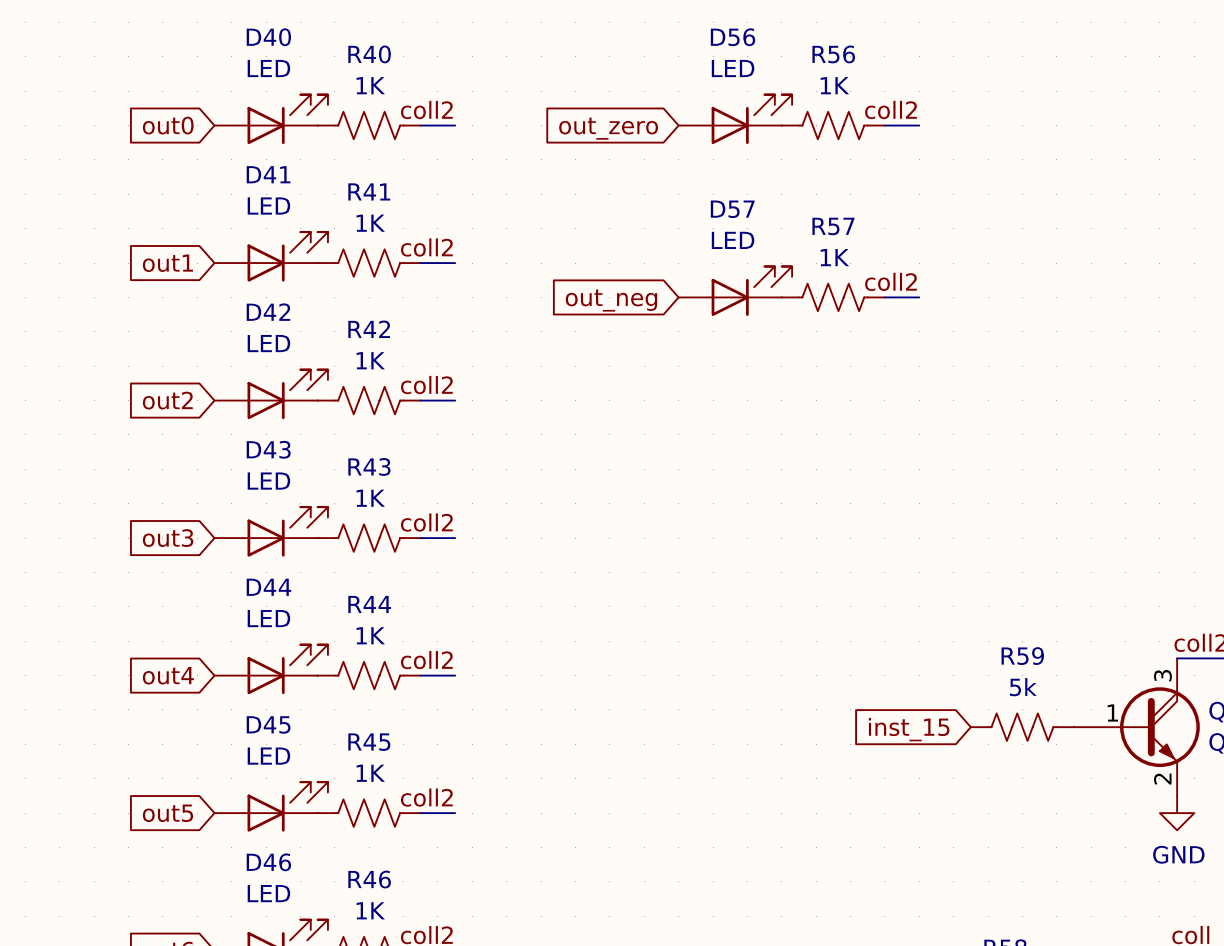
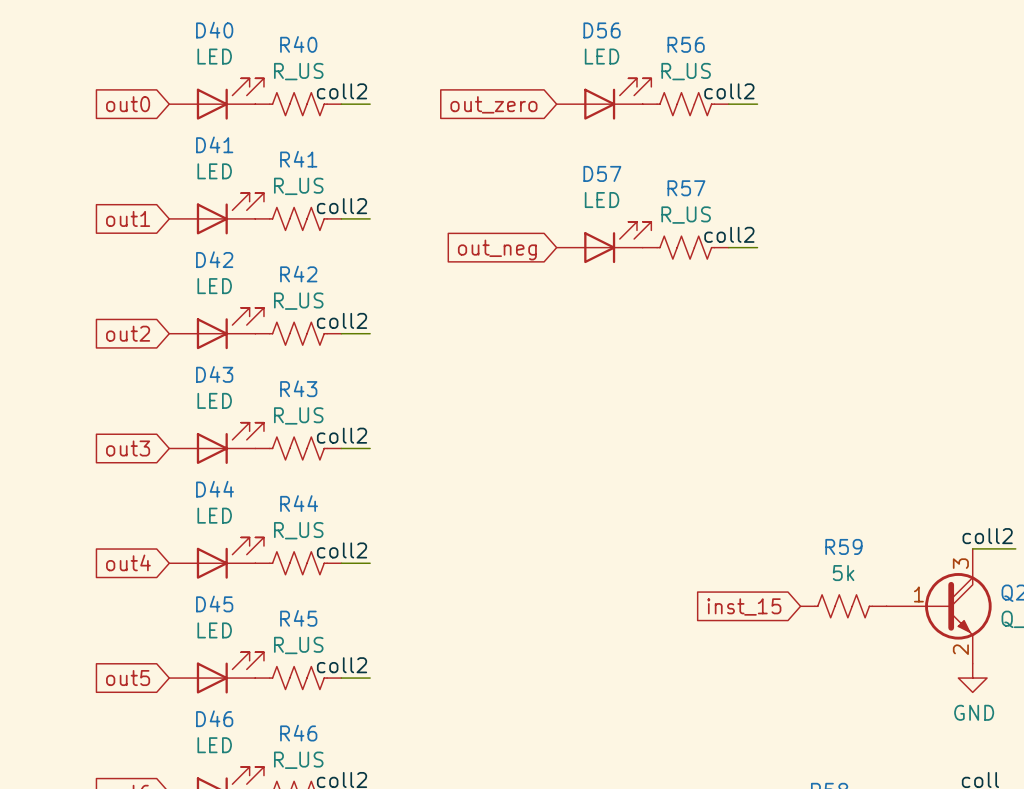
R40 value: 1K (370, 85) -> R_US (298, 71)
R56 value: 1K (834, 85) -> R_US (686, 71)
R41 value: 1K (370, 223) -> R_US (298, 186)
R57 value: 1K (834, 257) -> R_US (686, 215)
R42 value: 1K (370, 360) -> R_US (298, 301)
R43 value: 1K (370, 498) -> R_US (298, 415)
R44 value: 1K (370, 635) -> R_US (298, 530)
R45 value: 1K (370, 773) -> R_US (298, 645)
R46 value: 1K (370, 910) -> R_US (298, 760)

